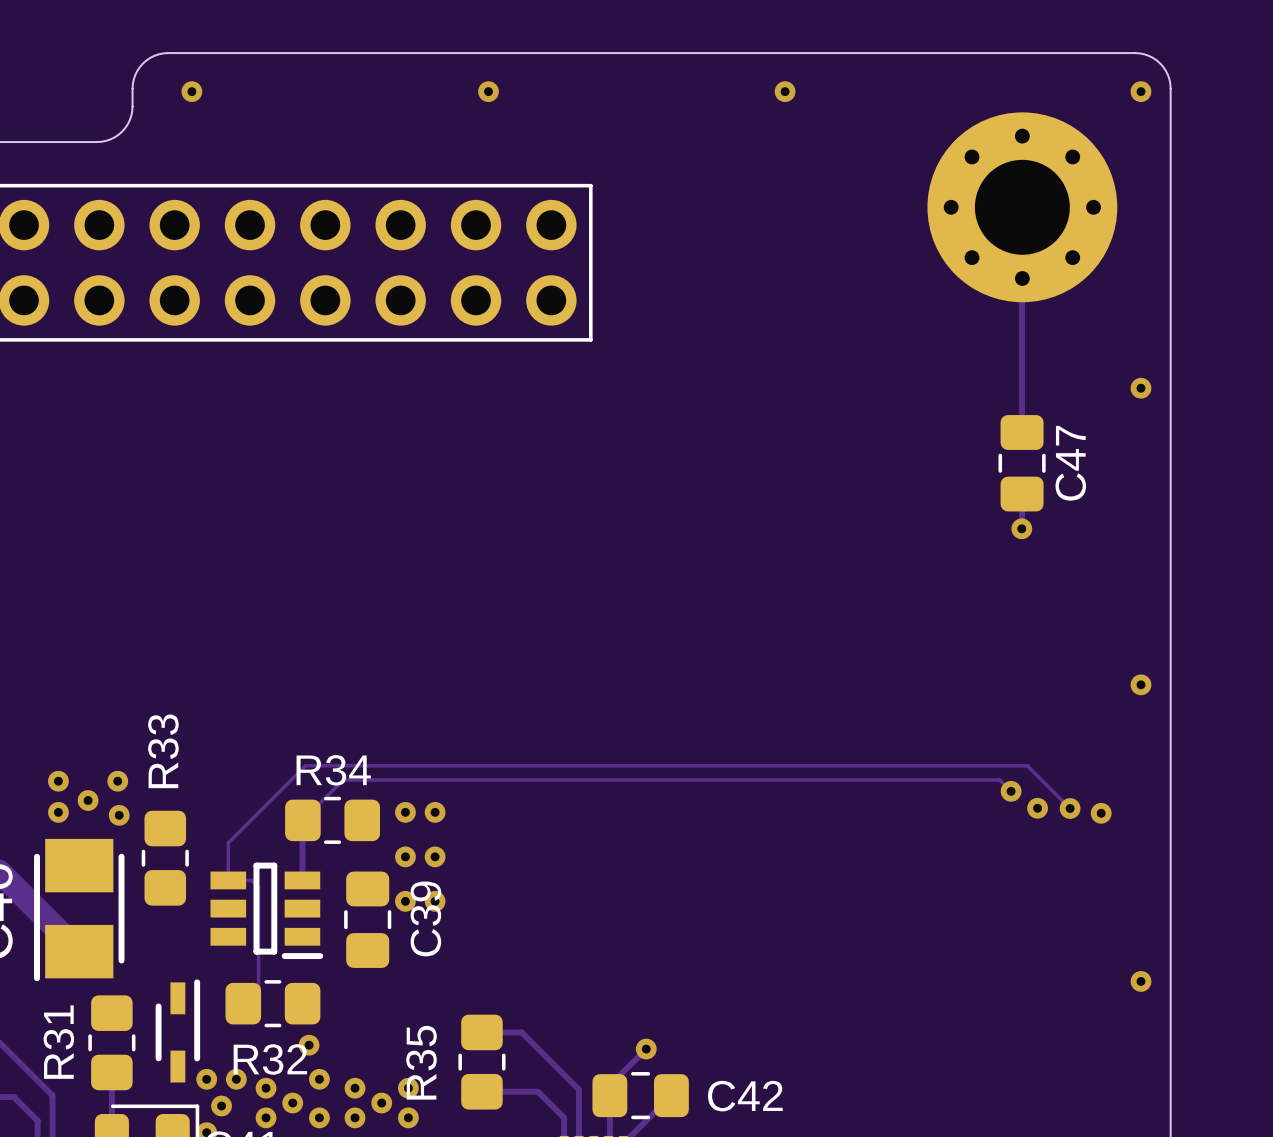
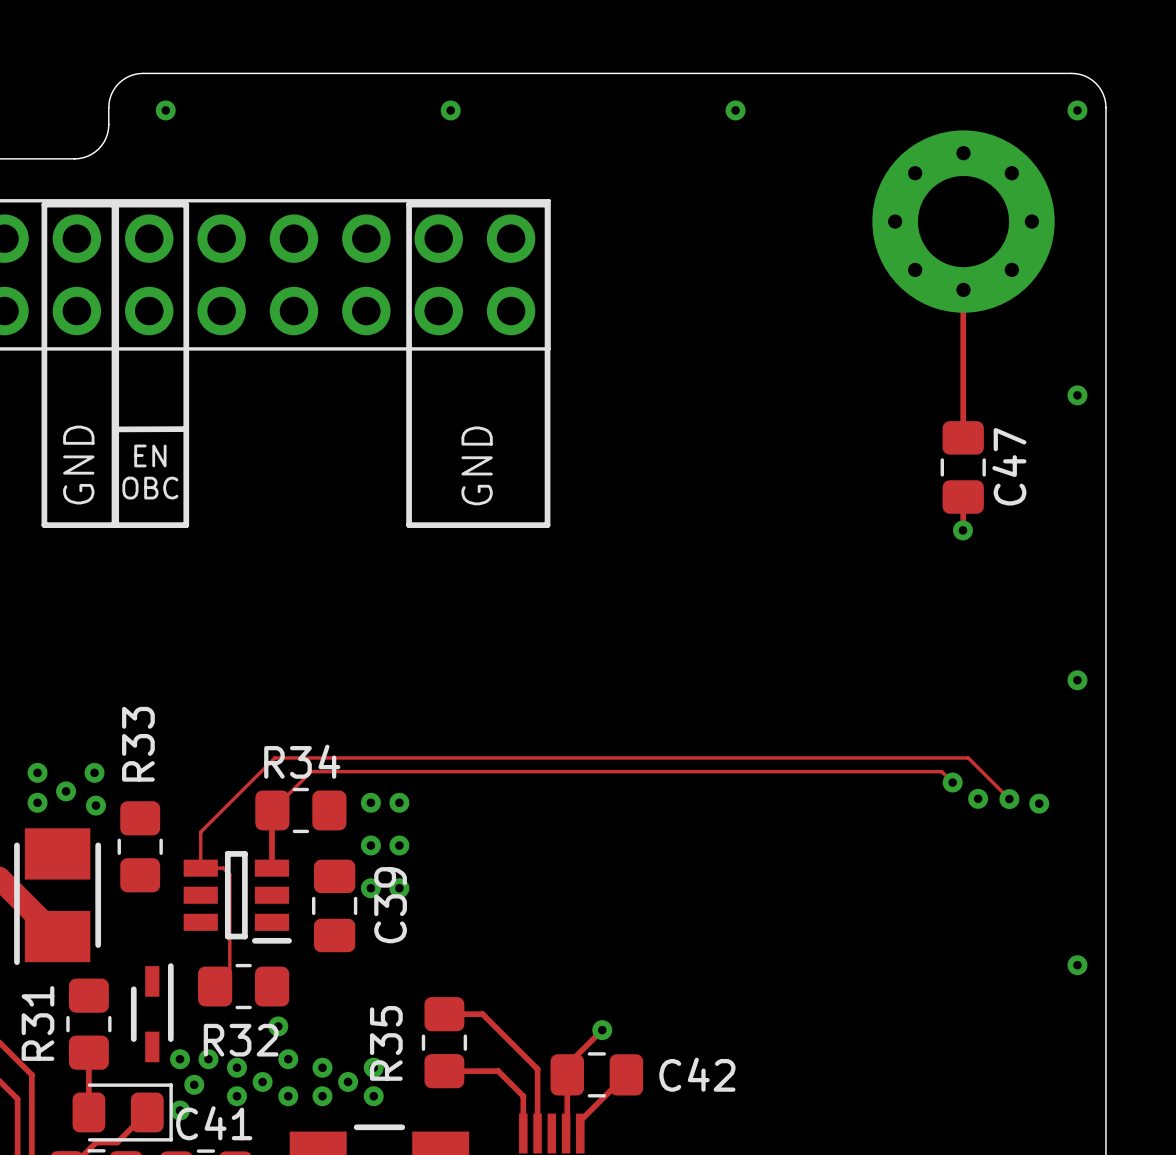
line: none -> (44, 204) (114, 204) (114, 525) (44, 525) (44, 204)
line: none -> (116, 204) (186, 204) (186, 525) (116, 525) (116, 204)
line: none -> (409, 204) (547, 204) (547, 525) (409, 525) (409, 204)
line: none -> (116, 429) (183, 429)
text: none -> EN (150, 455)
text: none -> GND (78, 465)
text: none -> GND (477, 465)
text: none -> OBC (150, 488)

